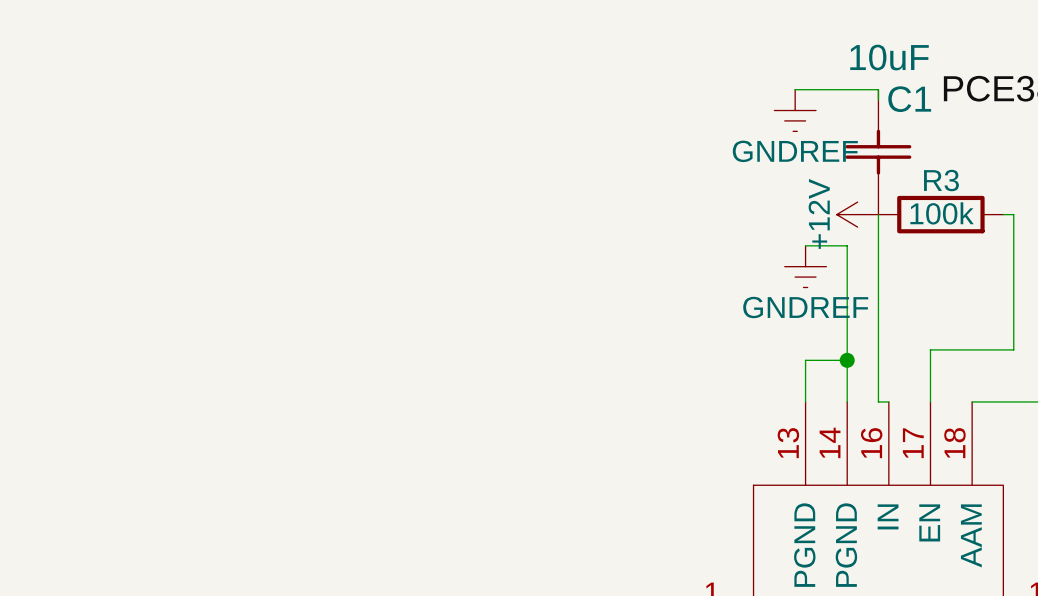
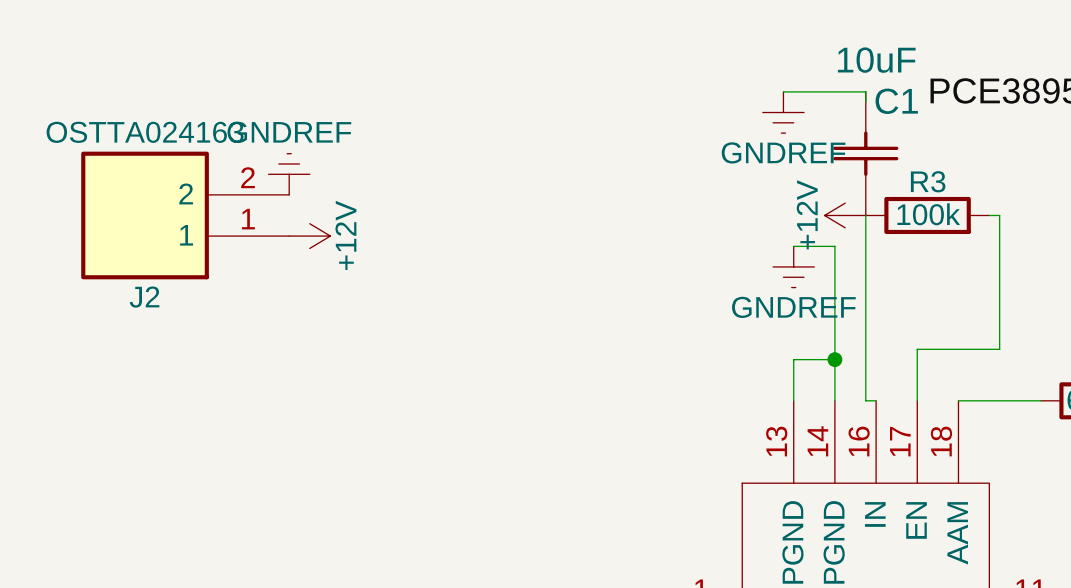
power symbol: none -> GNDREF (289, 174)
J2: none -> OSTTA024163 (185, 215)
power symbol: none -> +12V (309, 236)

